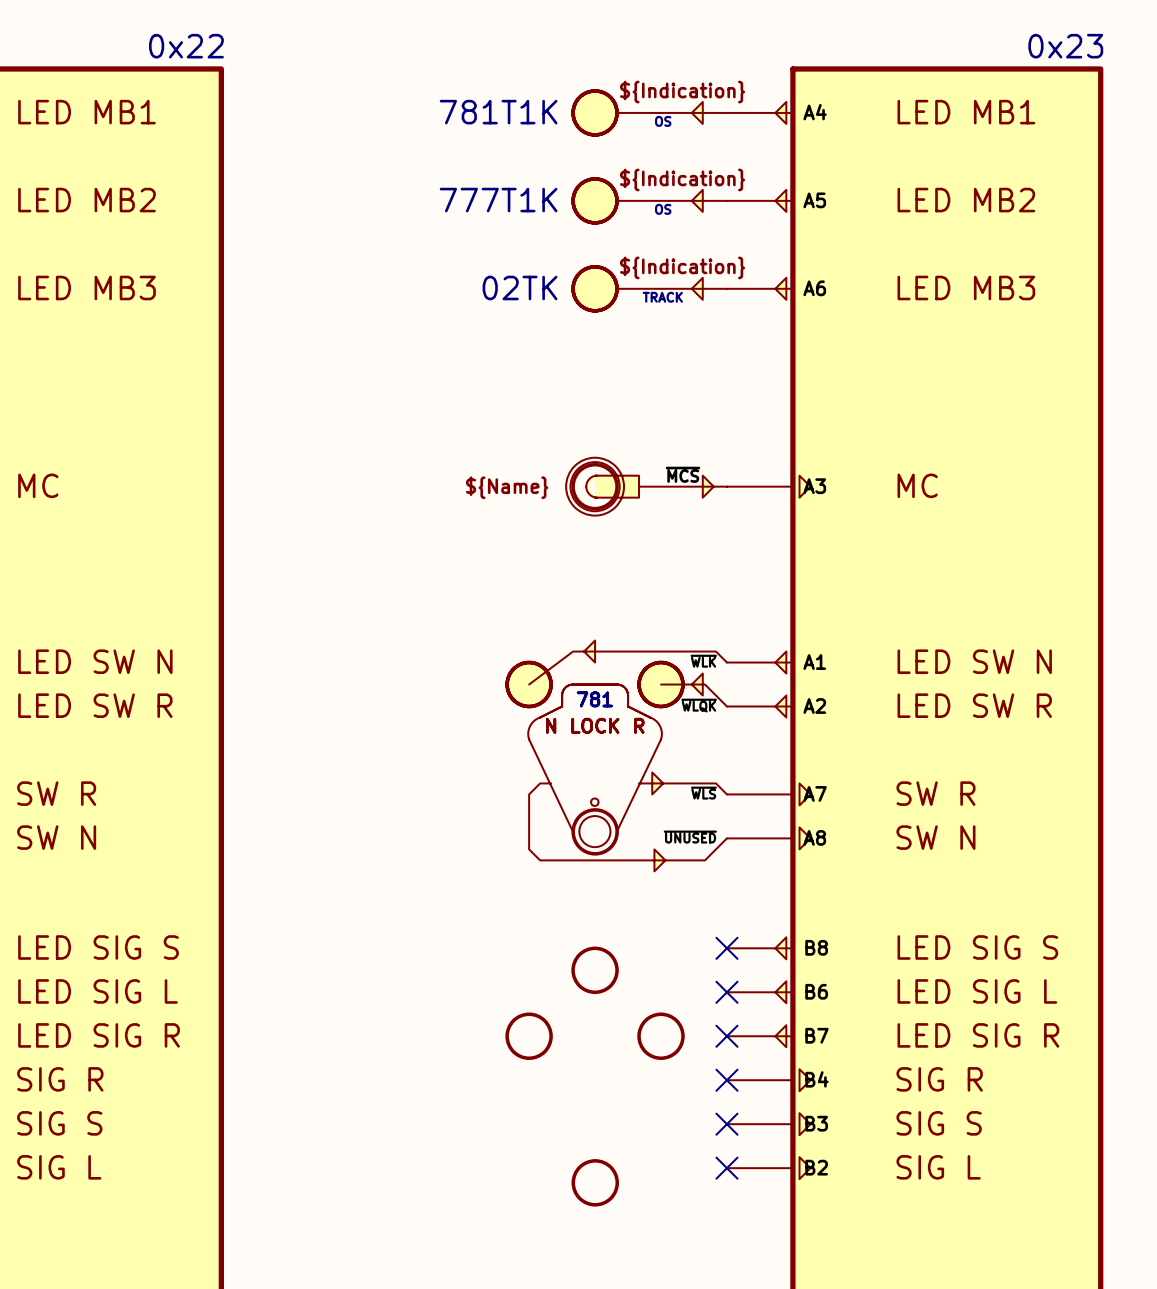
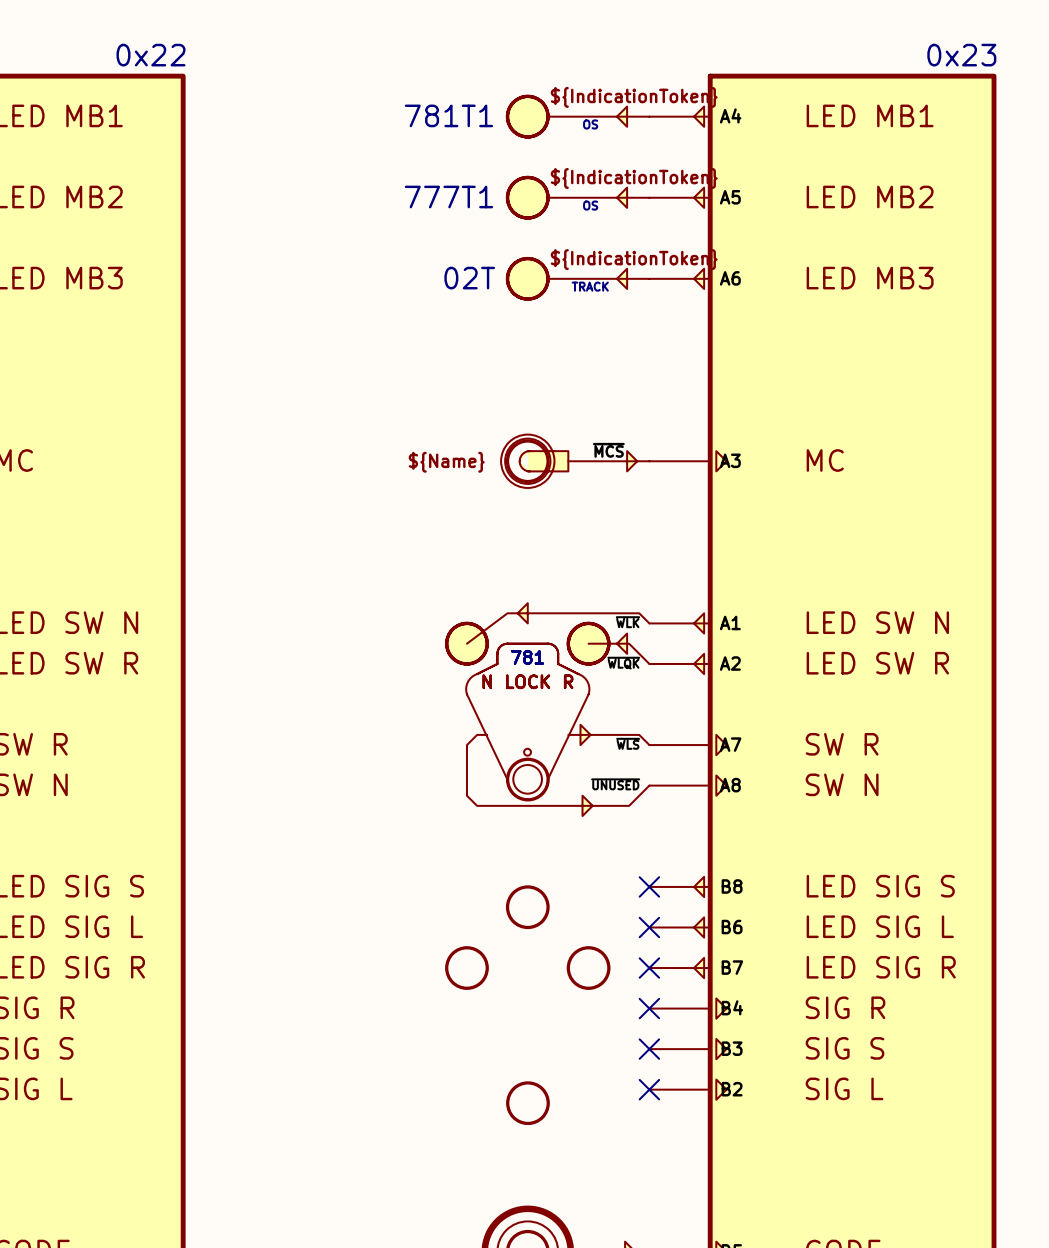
part text: ${Indication} (682, 92) -> ${IndicationToken} (634, 97)
part text: 781T1K (498, 112) -> none
part text: none -> 781T1 (448, 115)
part text: ${Indication} (682, 179) -> ${IndicationToken} (634, 178)
part text: 777T1K (498, 200) -> none
part text: none -> 777T1 (448, 196)
part text: ${Indication} (682, 267) -> ${IndicationToken} (634, 259)
part text: 02TK (520, 287) -> none
part text: none -> 02T (469, 278)

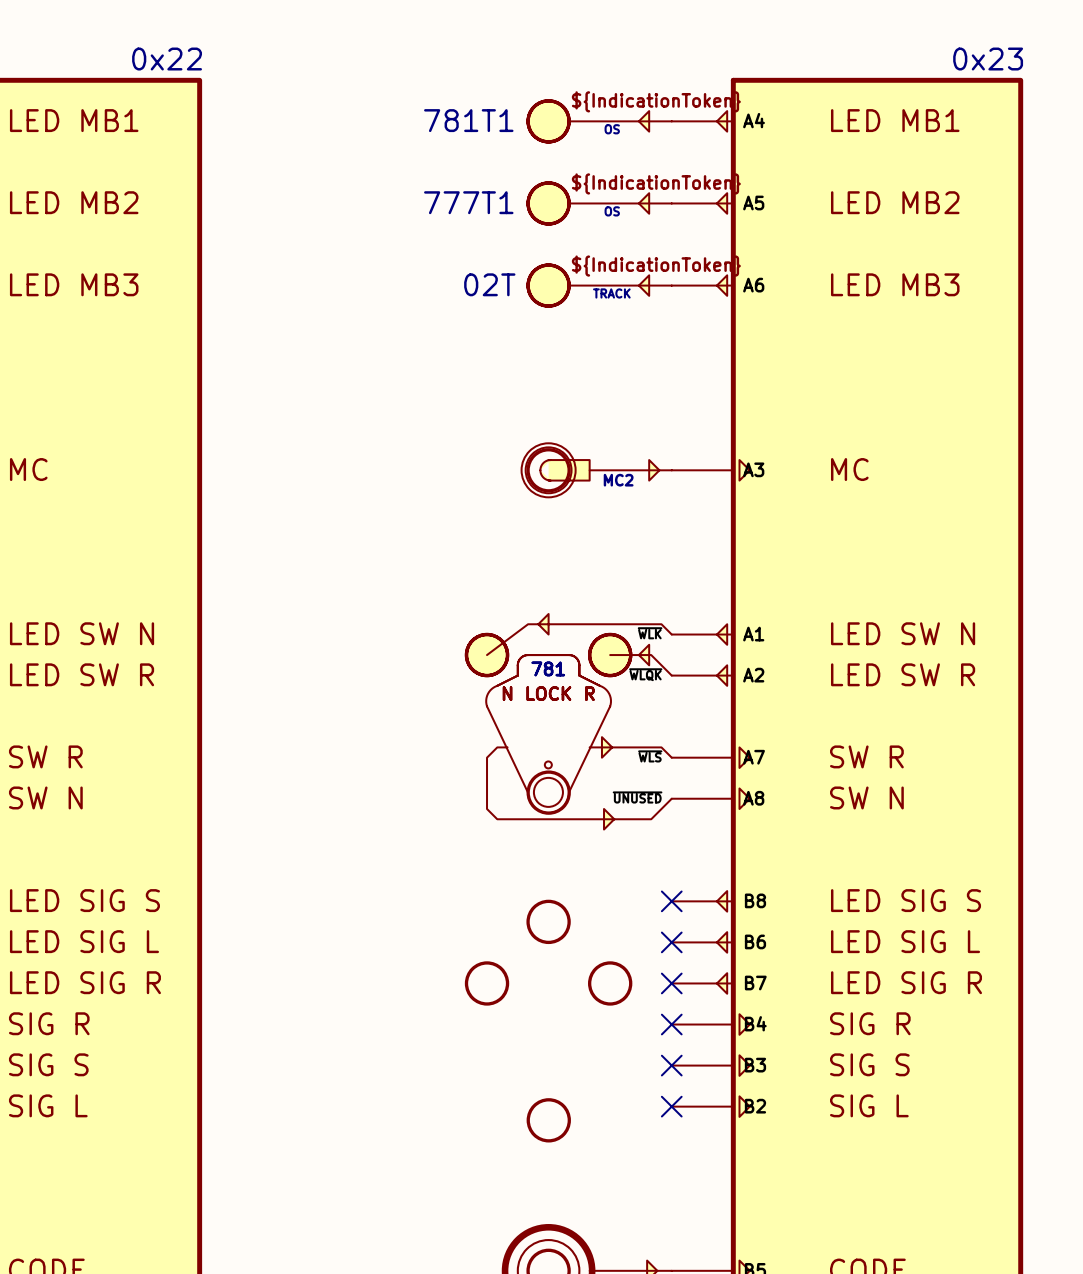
part pin name: ~{MCS} (608, 450) -> none
part text: ${Name} (446, 462) -> none
part value: none -> MC2 (618, 480)

